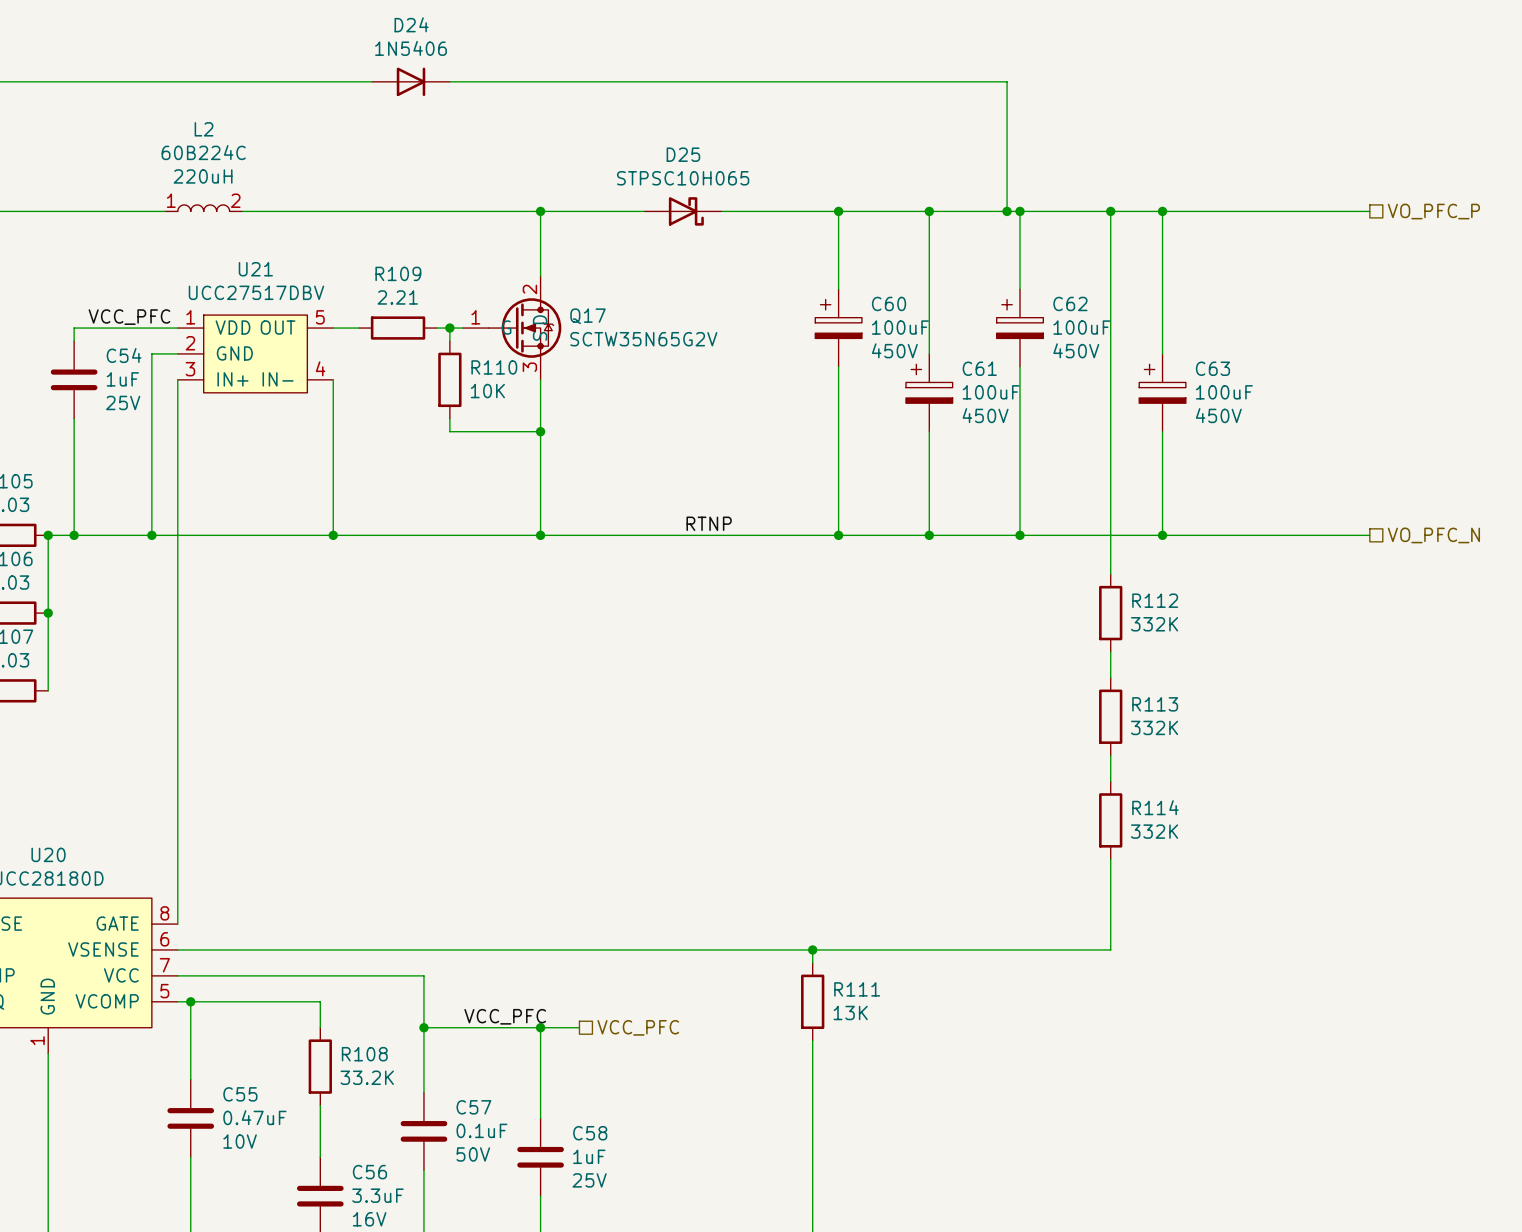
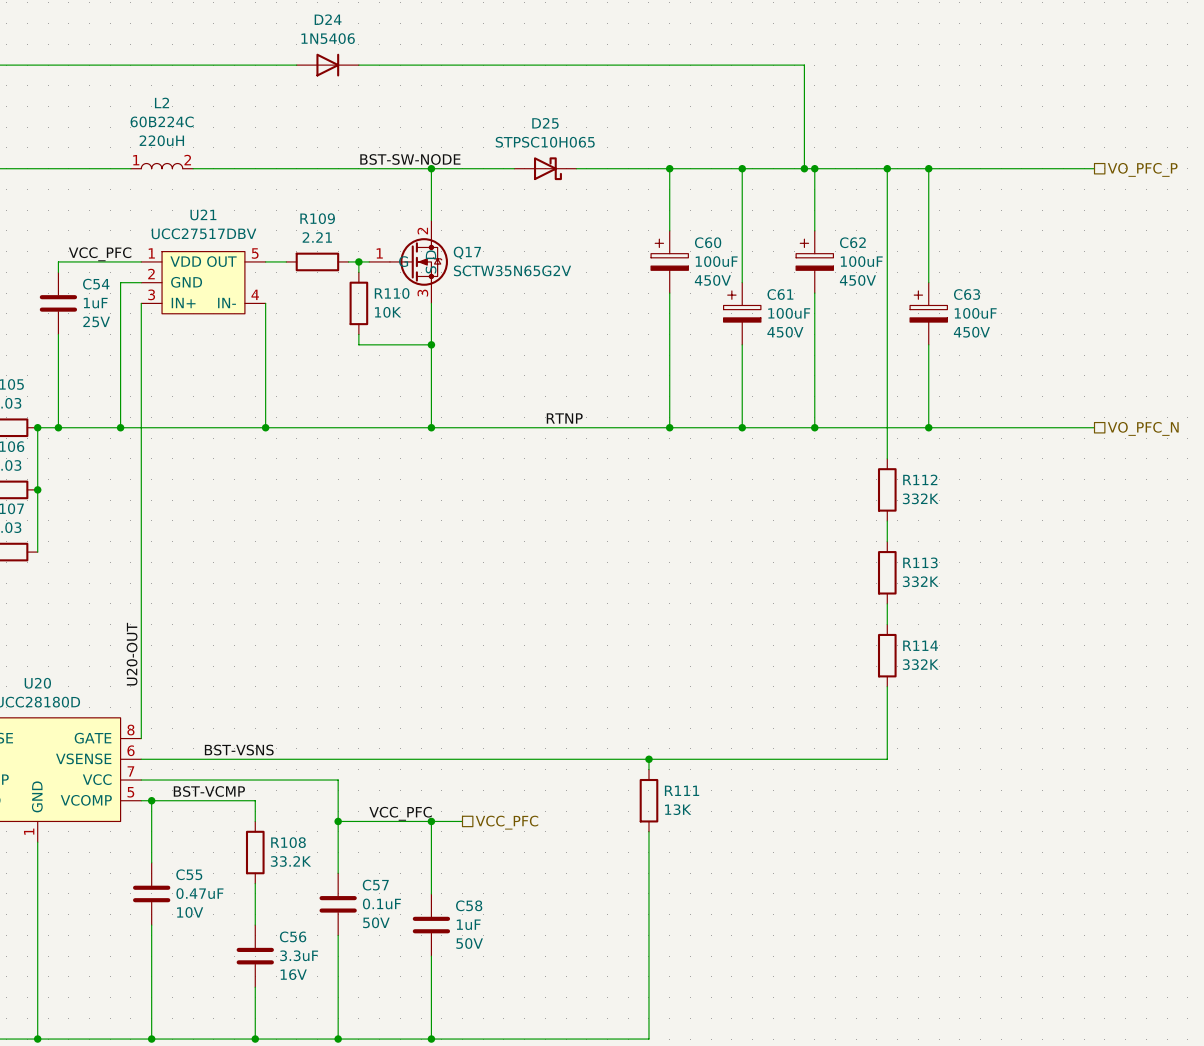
label: none -> BST-SW-NODE (410, 159)
label: none -> U20-OUT (132, 654)
label: none -> BST-VSNS (239, 750)
label: none -> BST-VCMP (209, 791)
C58 text: 25V (589, 1180) -> 50V (469, 943)

